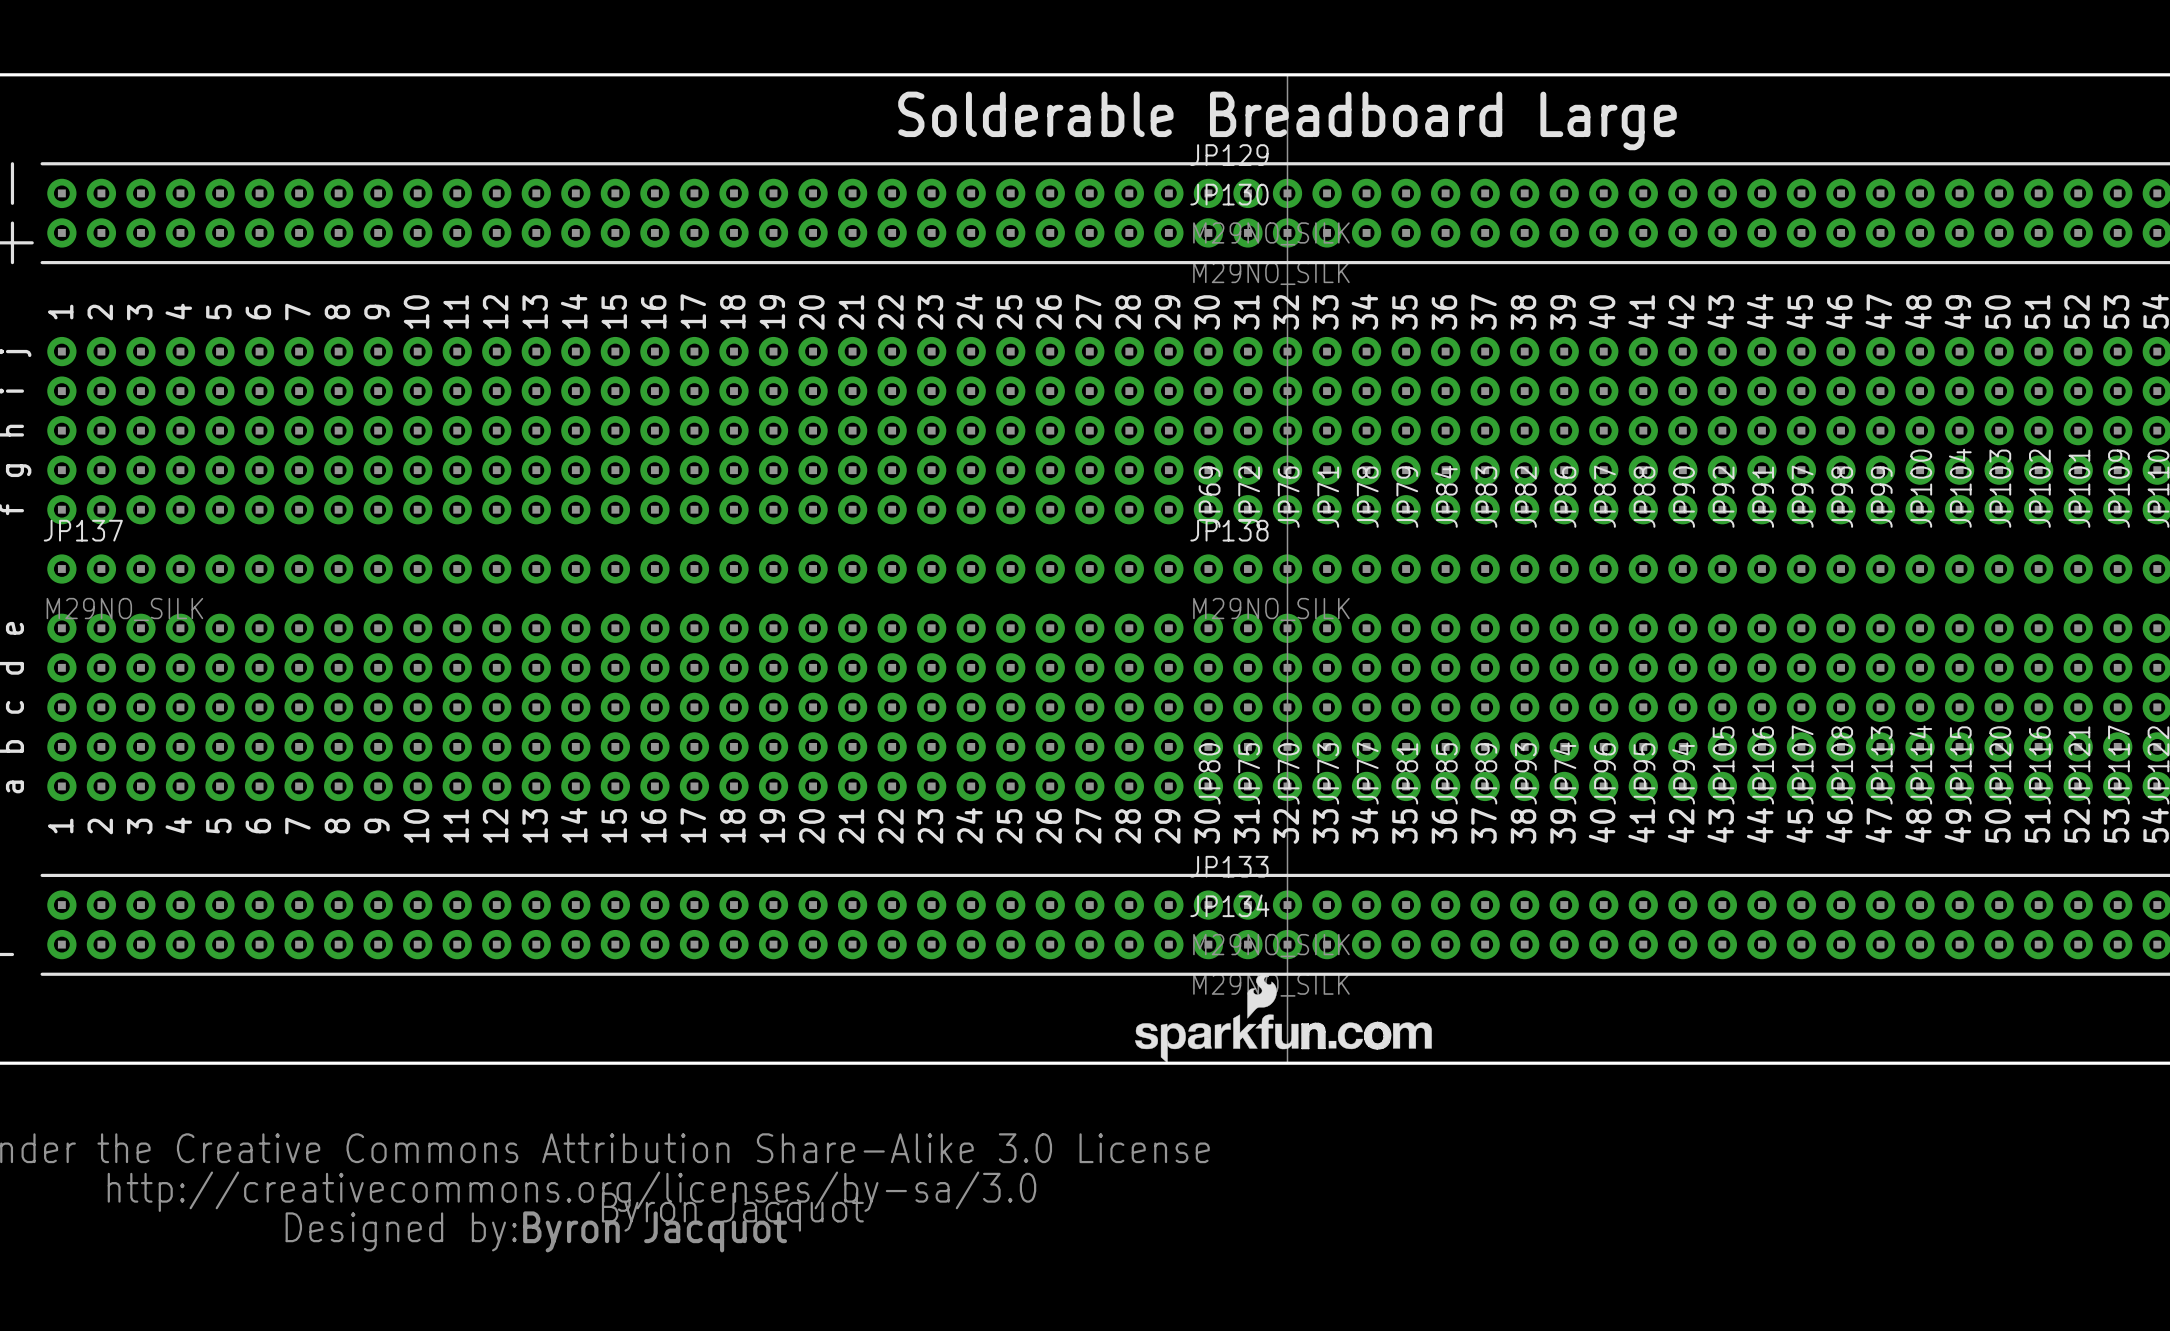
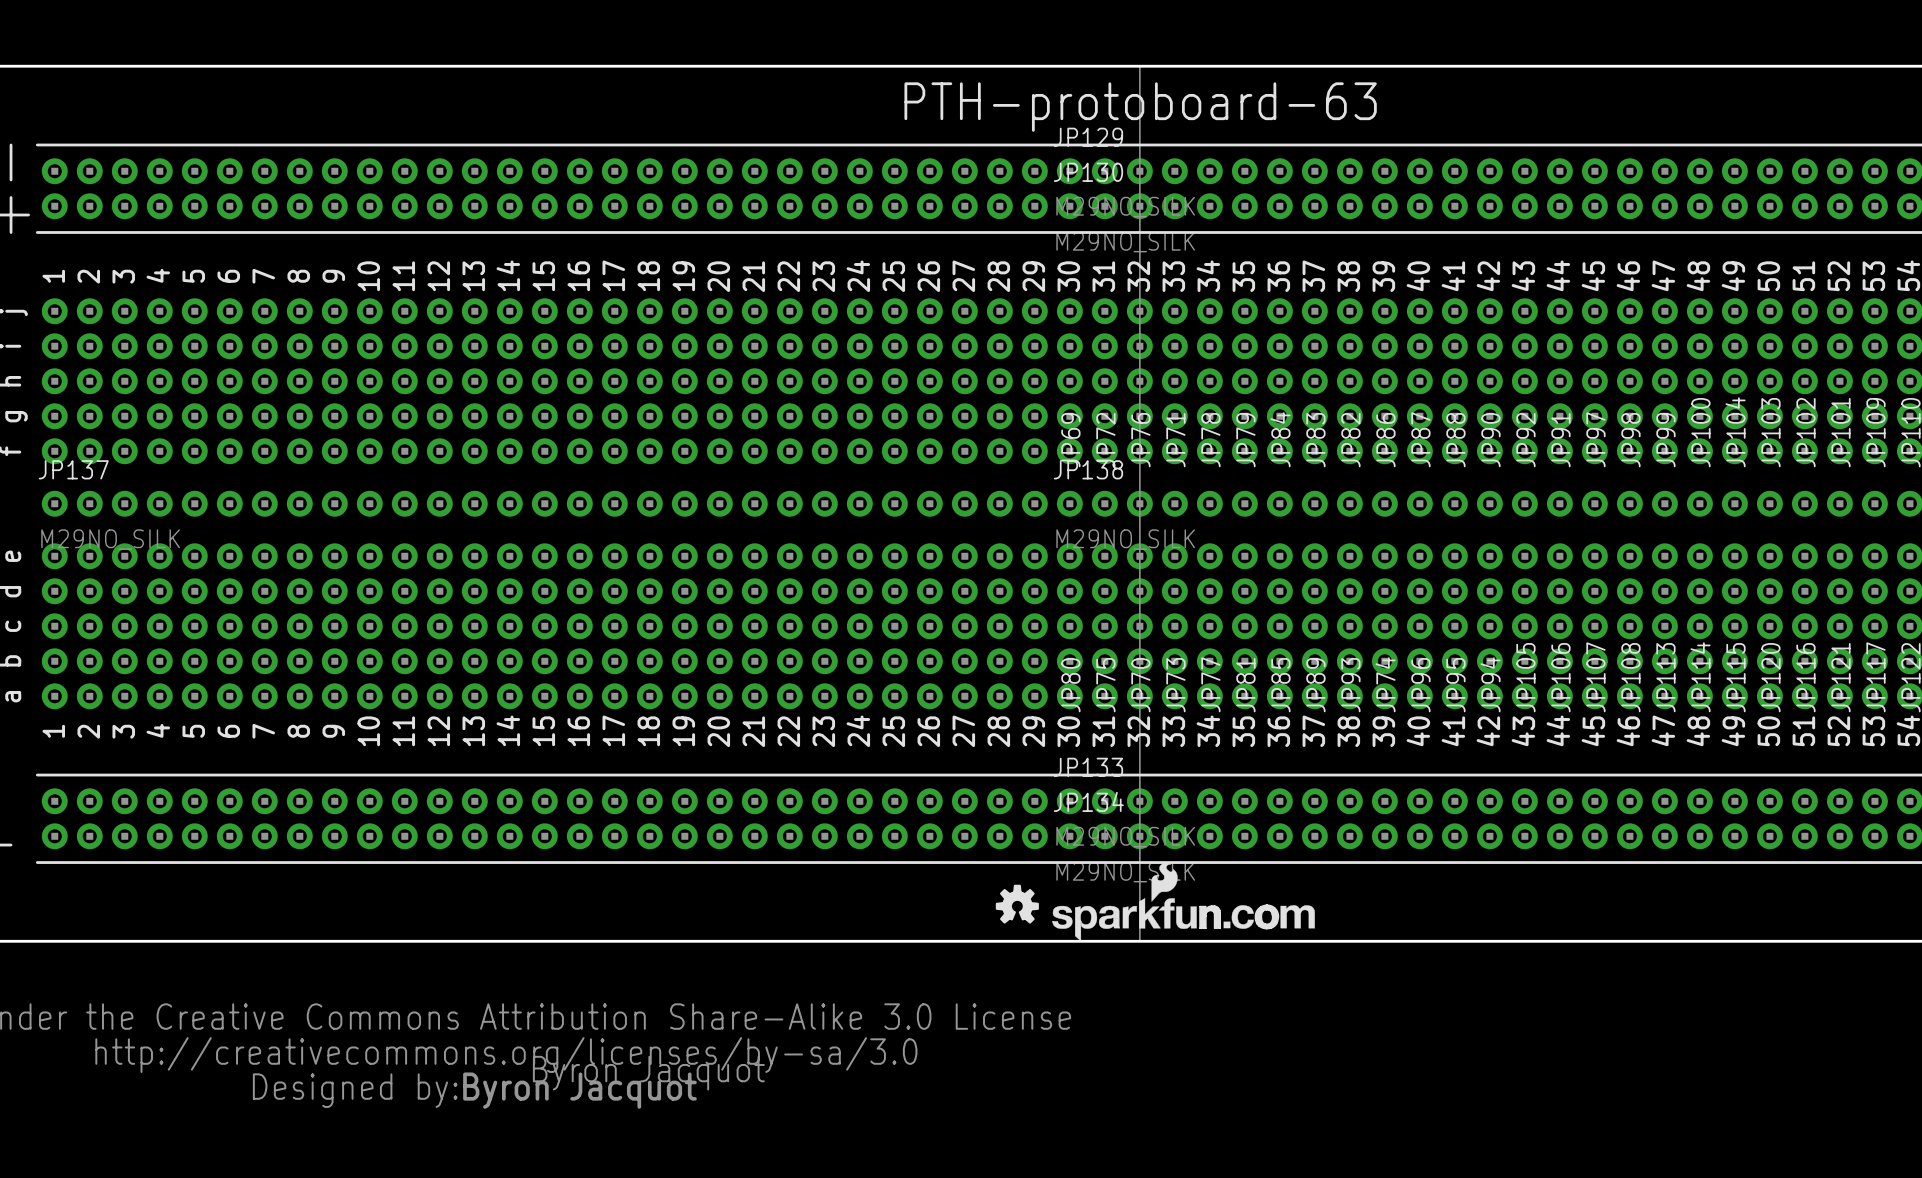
text: Solderable Breadboard Large (1287, 120) -> PTH-protoboard-63 (1140, 107)
drawing: none -> [995, 884, 1039, 924]
drawing position: (1283, 1018) -> (1183, 901)

